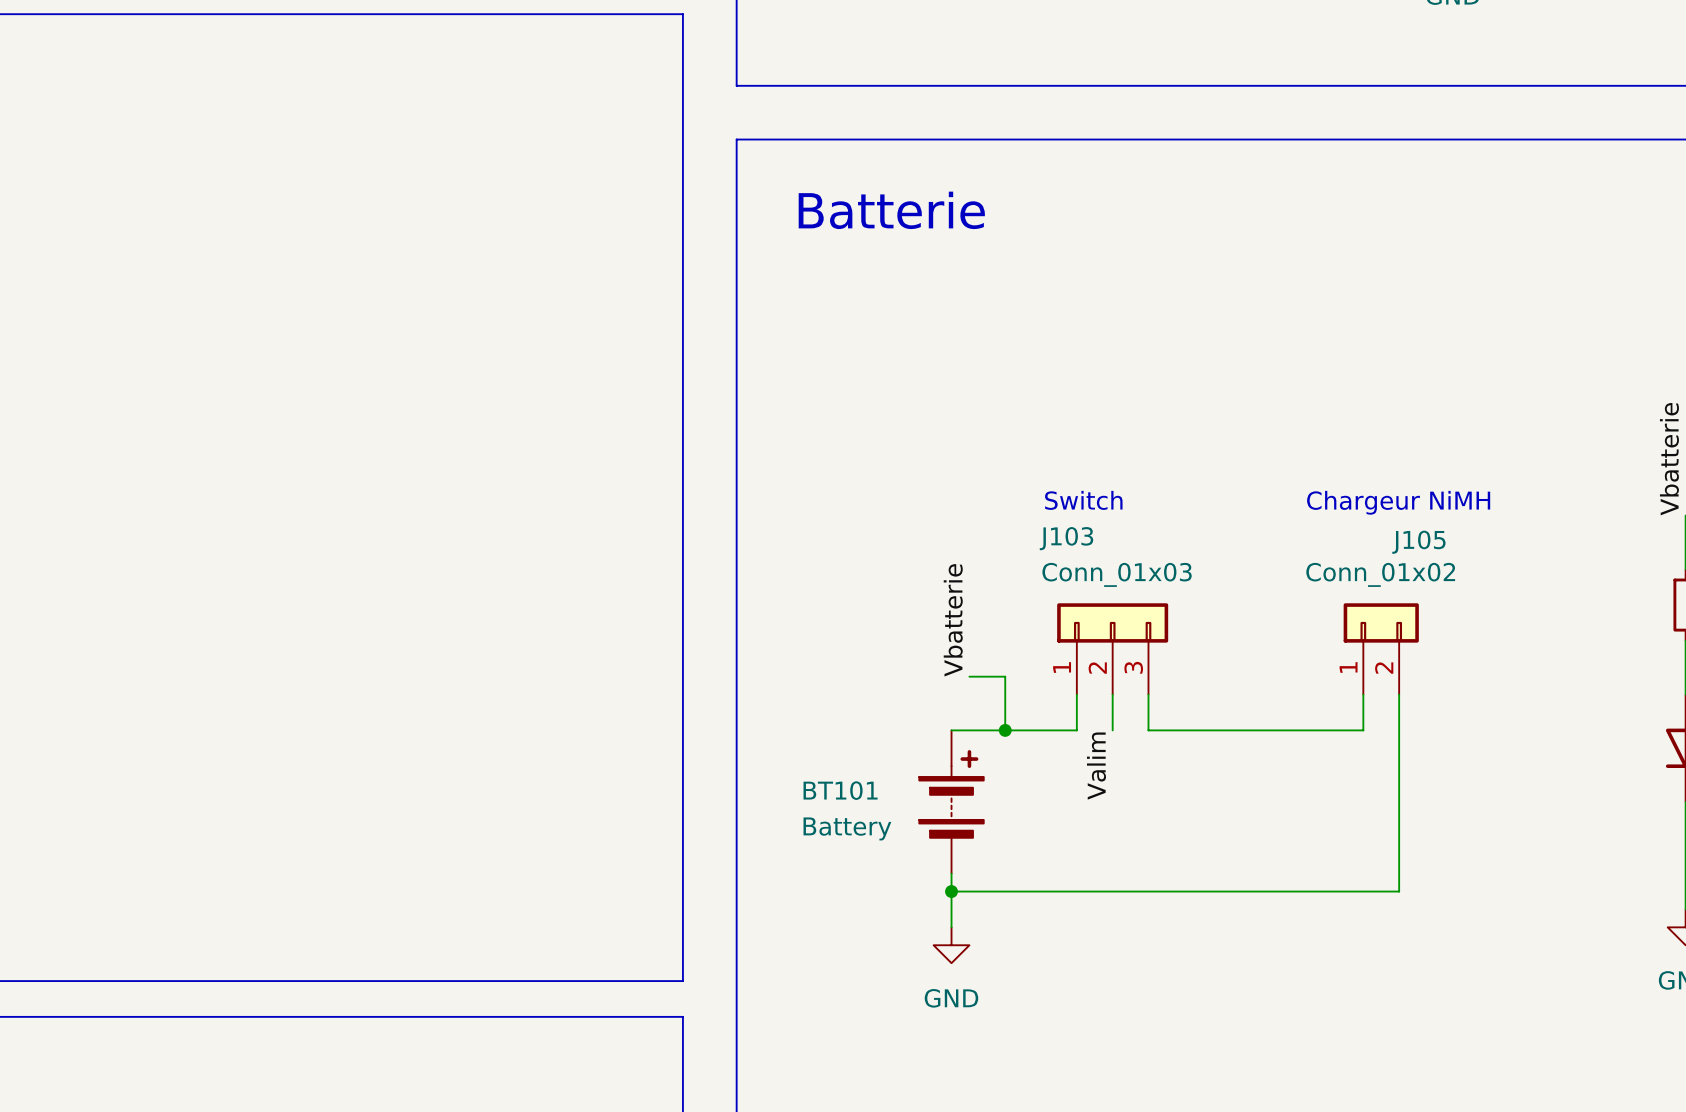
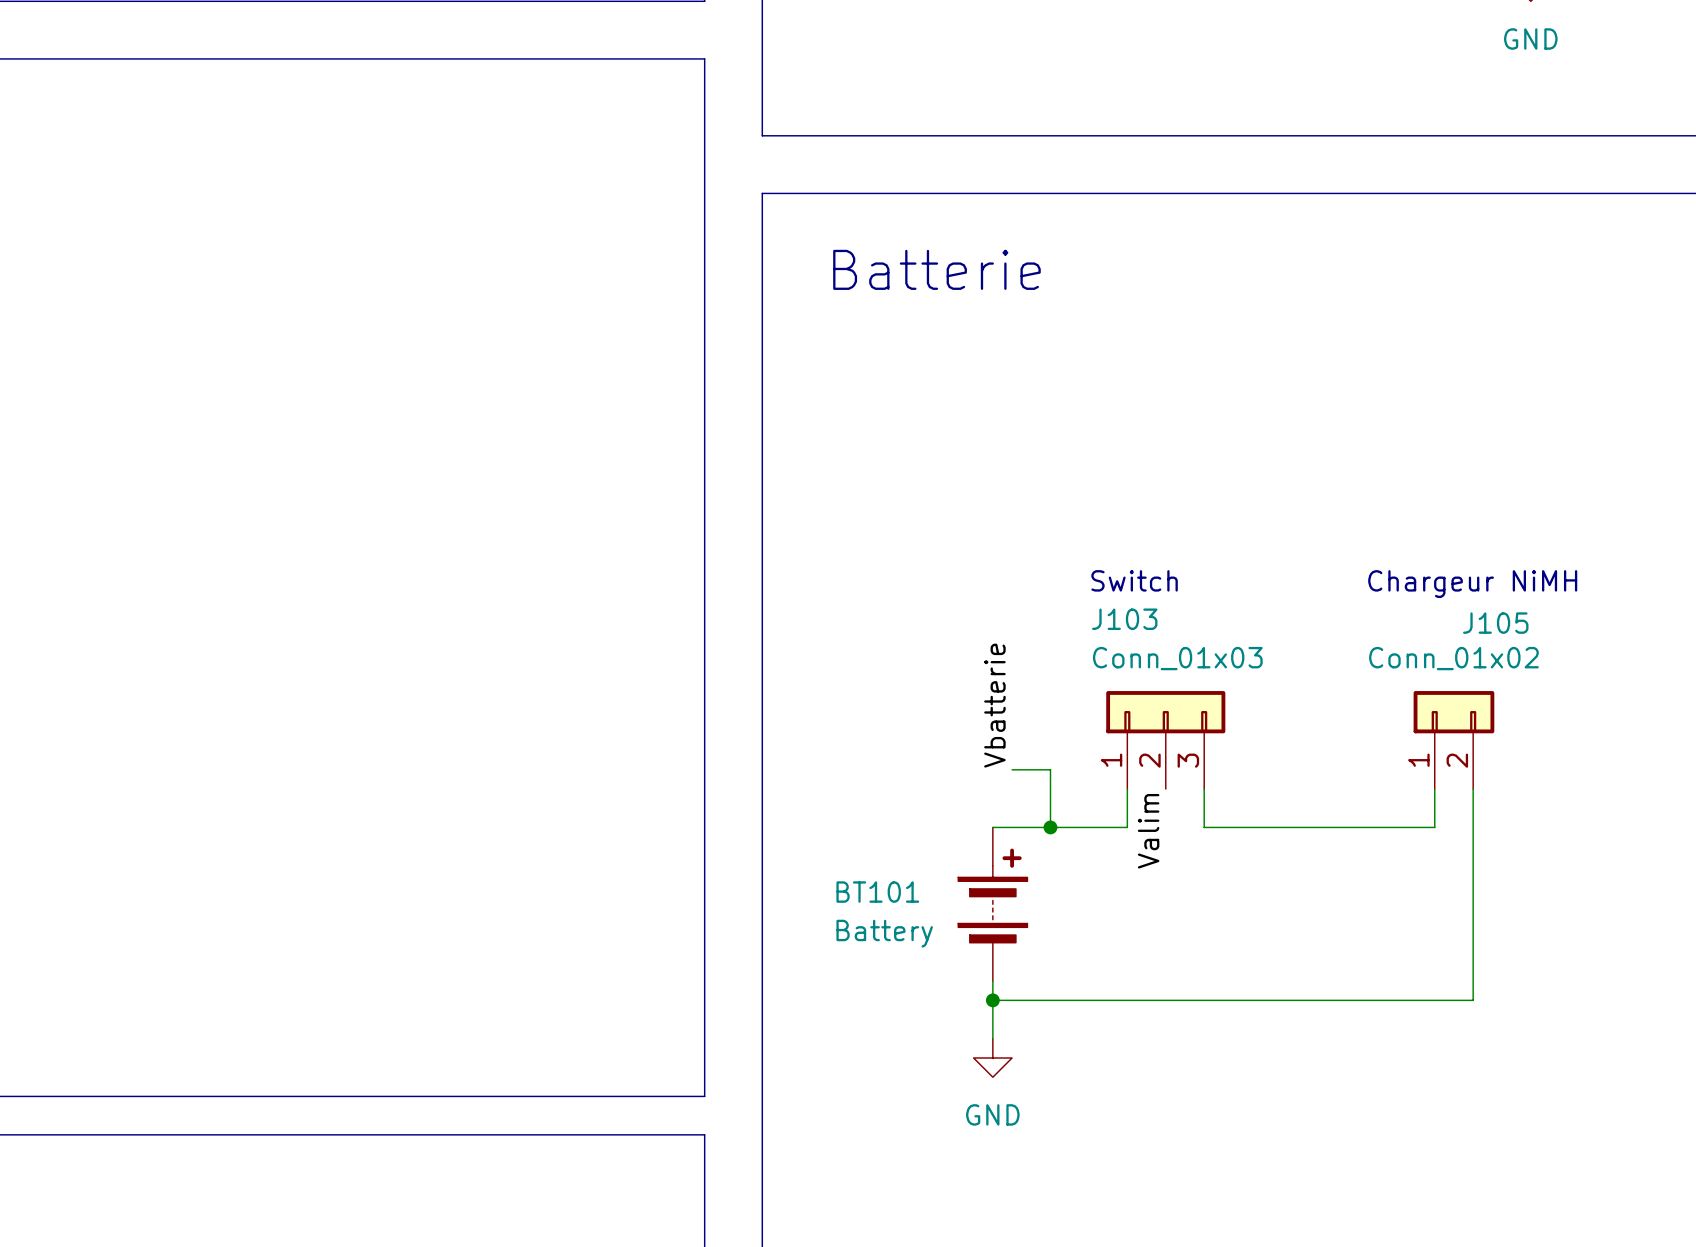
wire: (1112, 694) (1112, 730) -> none
label position: Valim (1096, 766) -> Valim (1148, 831)

